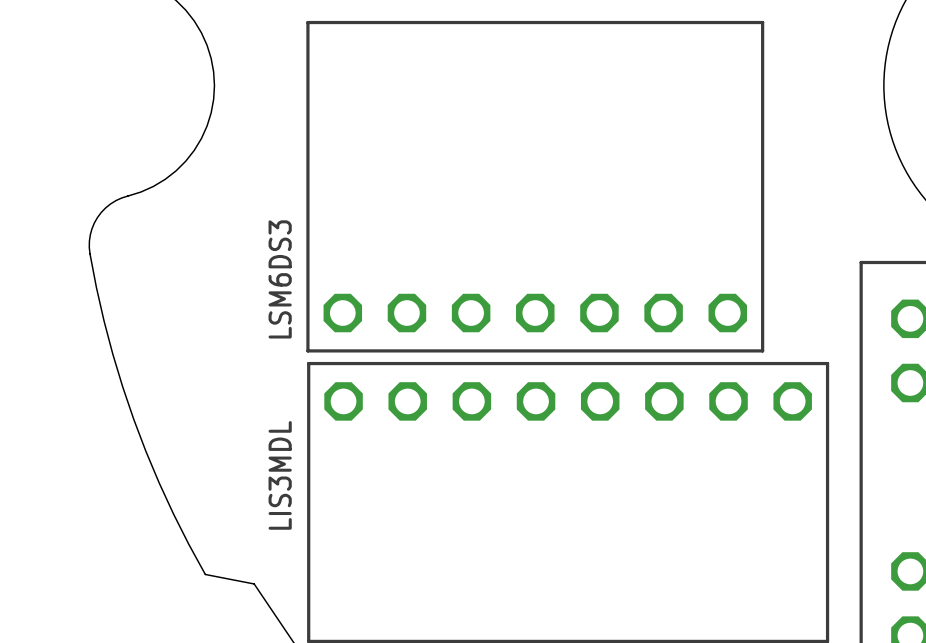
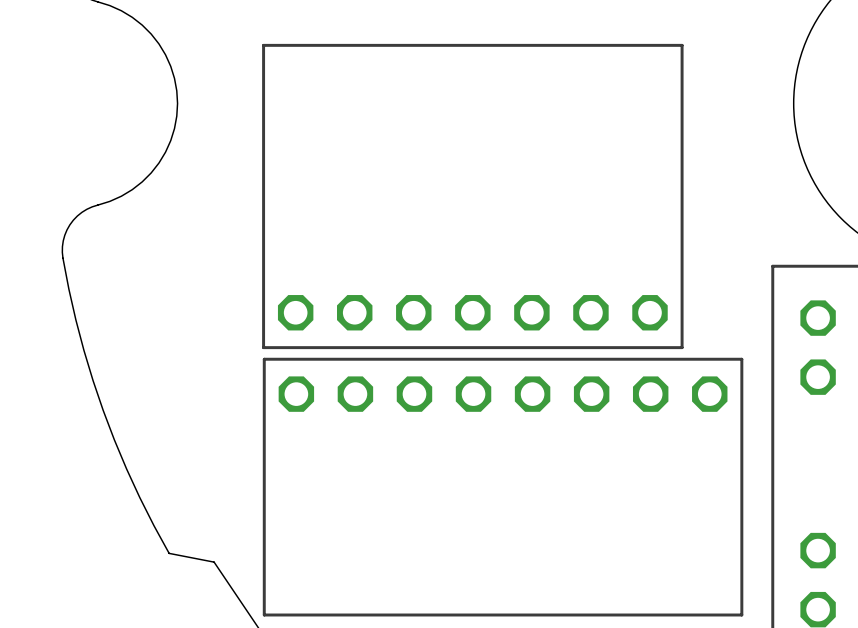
LSM6DS3 name: LSM6DS3 (280, 279) -> none
LIS3MDL name: LIS3MDL (280, 475) -> none

